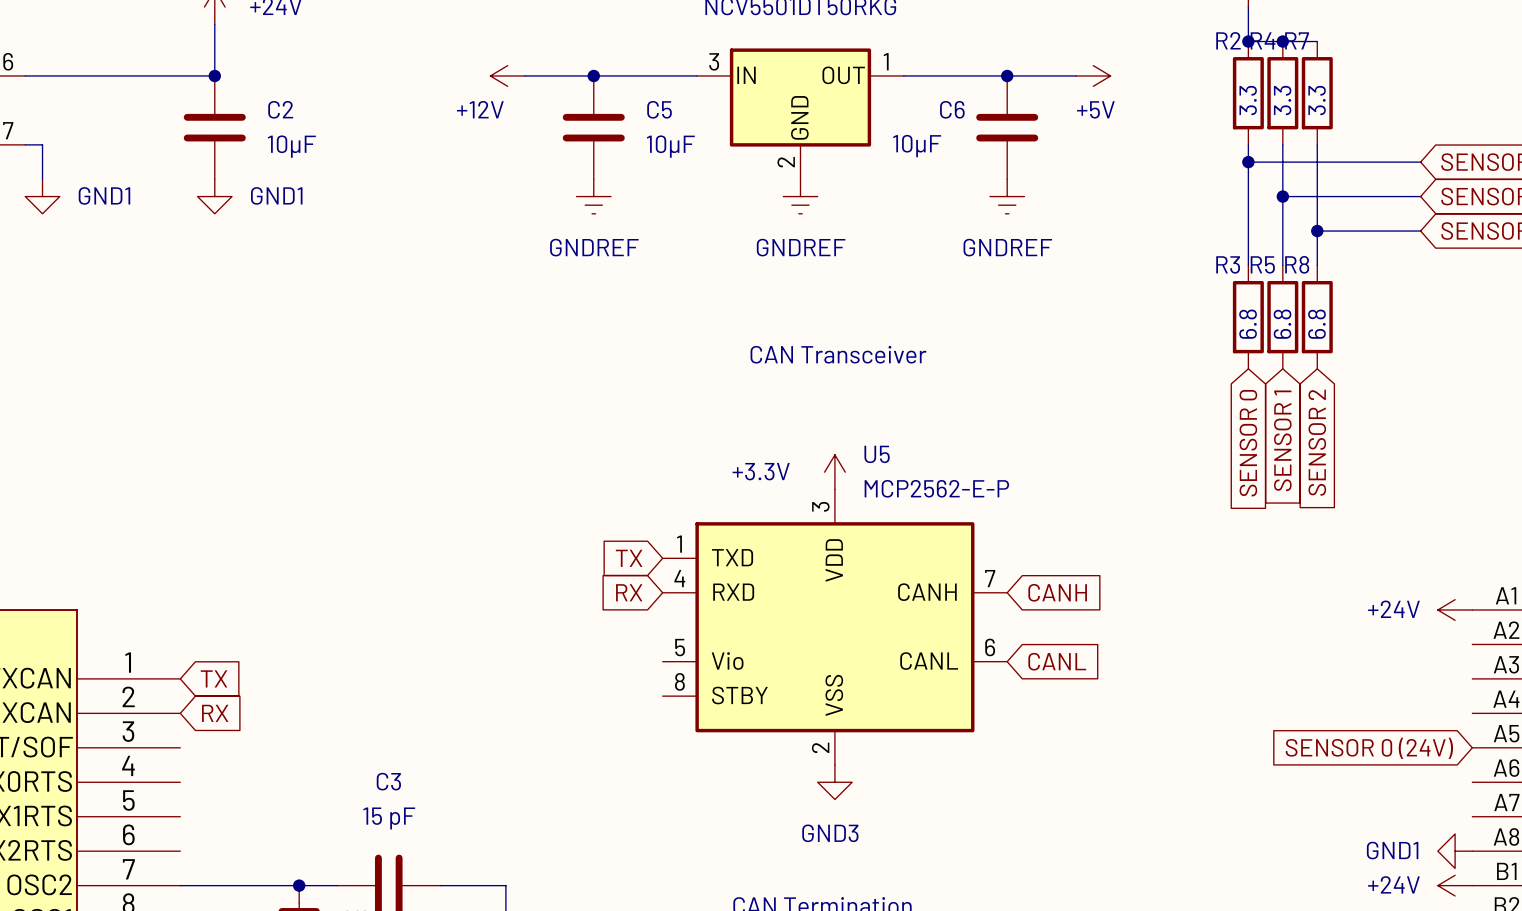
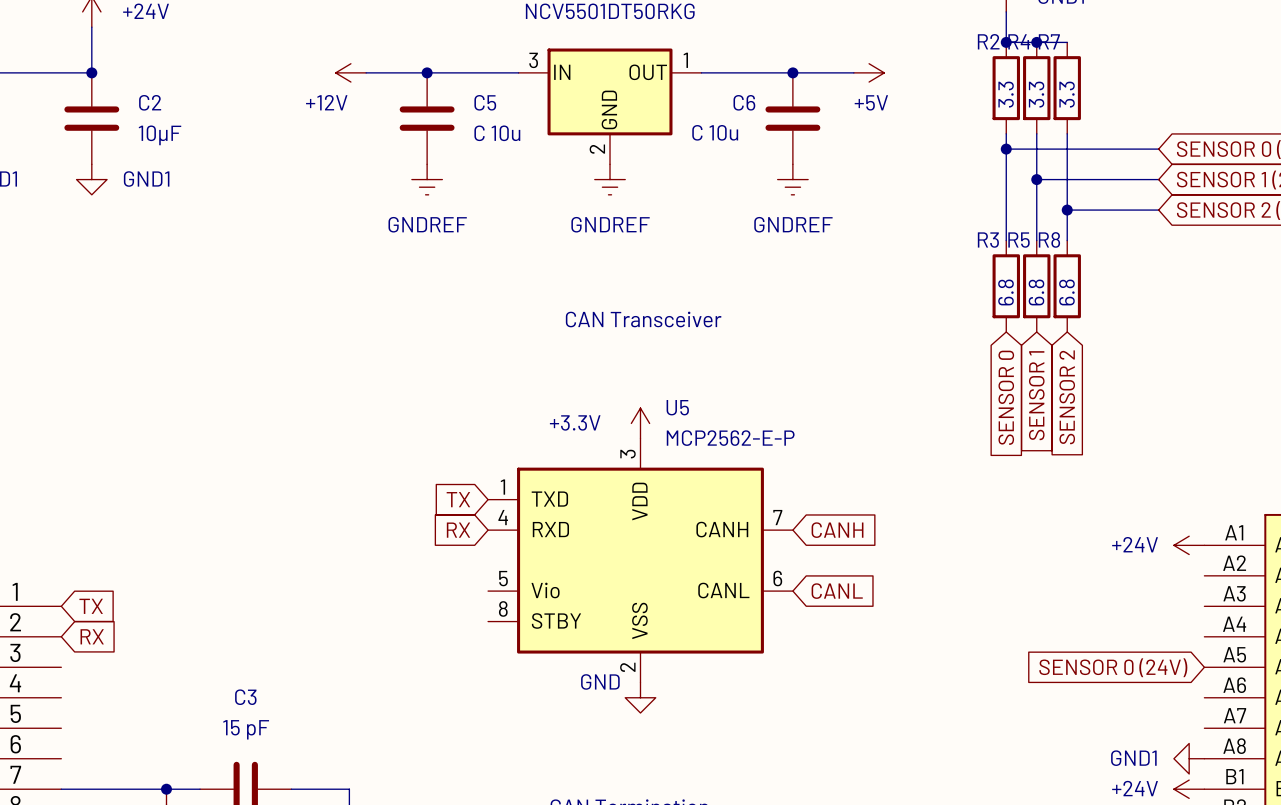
C5 value: 10μF (670, 146) -> C 10u (497, 133)
C6 value: 10μF (917, 146) -> C 10u (715, 132)
power symbol: GND3 (834, 782) -> GND (640, 697)

